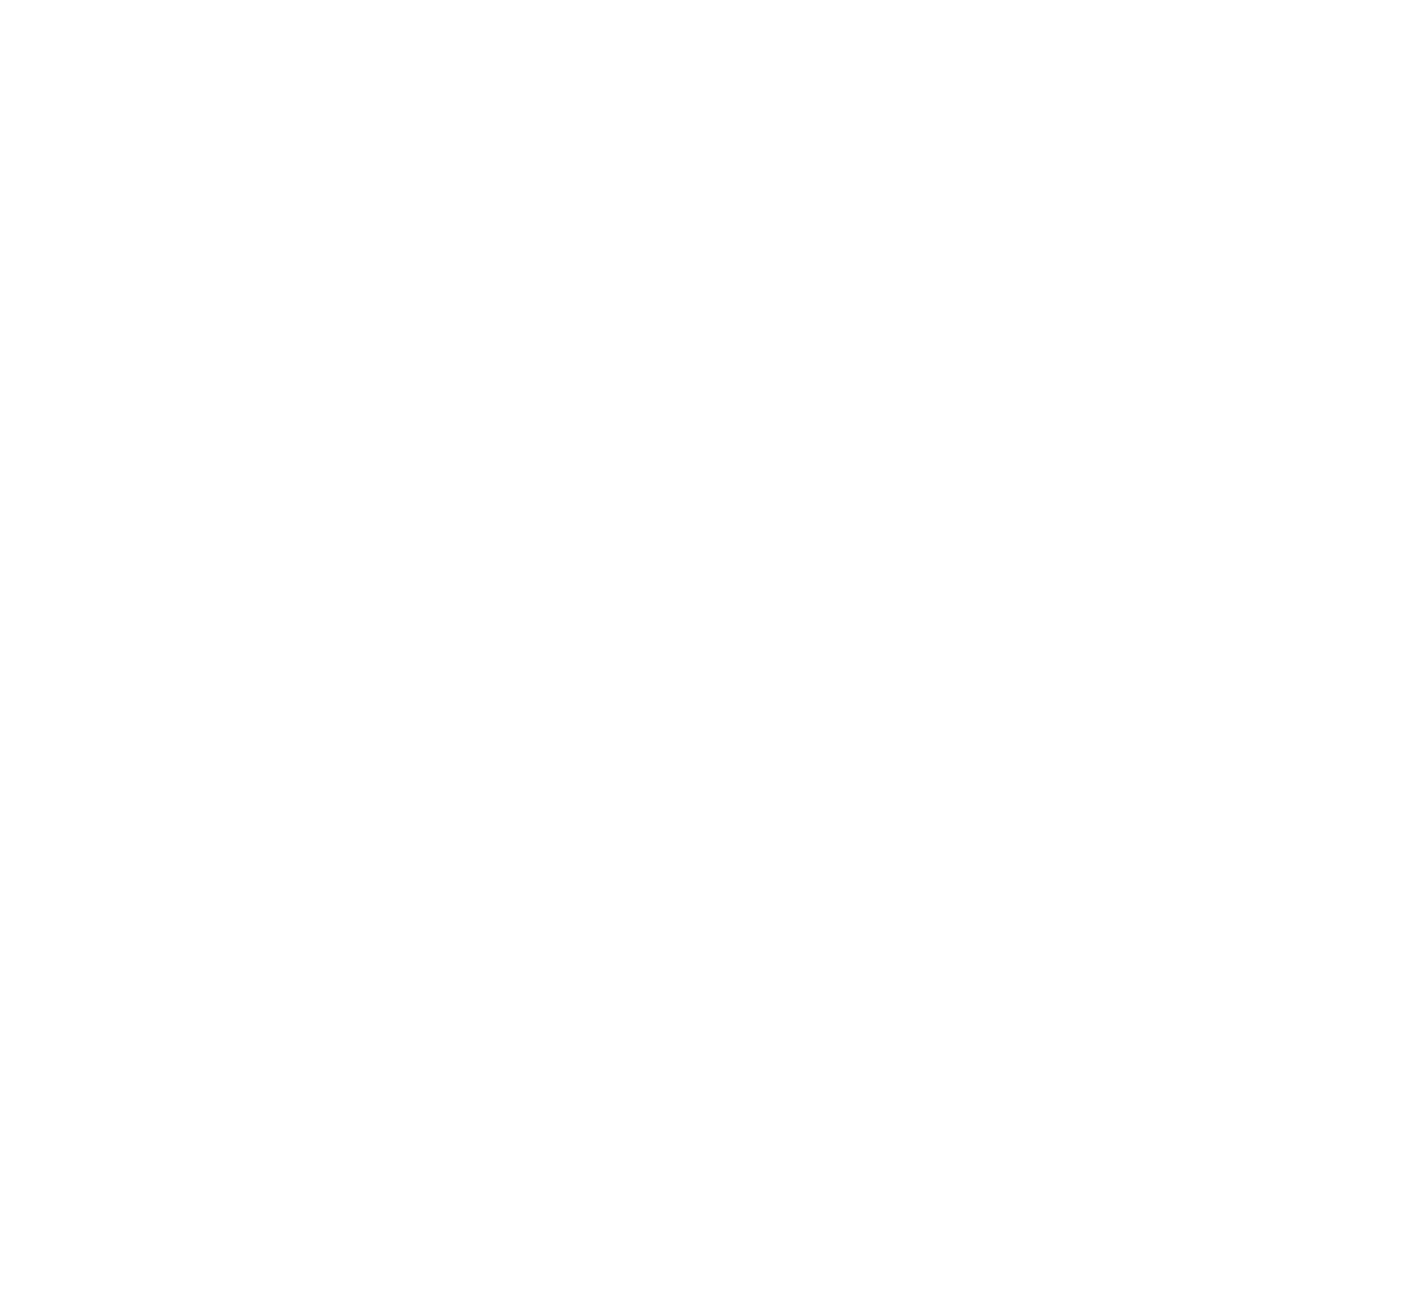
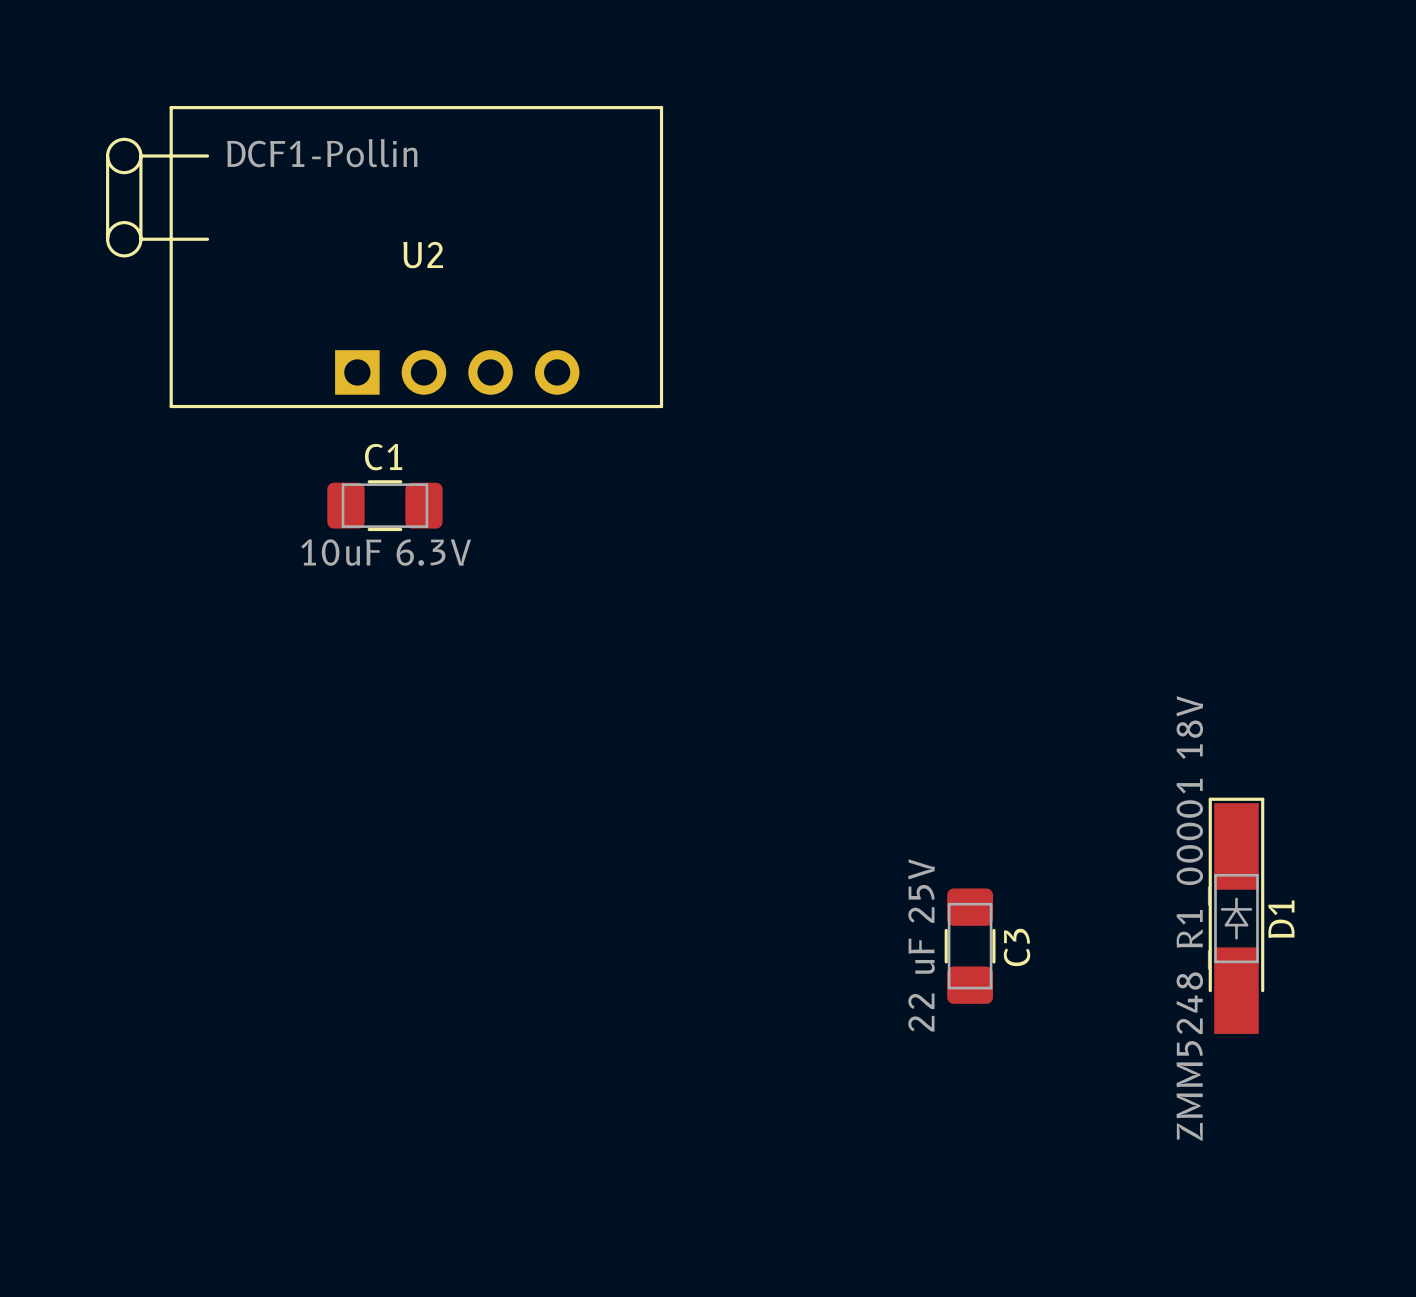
U2: none -> DCF1-Pollin (384, 257)
C1: none -> 10uF 6.3V (384, 505)
D1: none -> ZMM5248_R1_00001 18V (1236, 915)
C3: none -> 22 uF 25V (970, 946)

